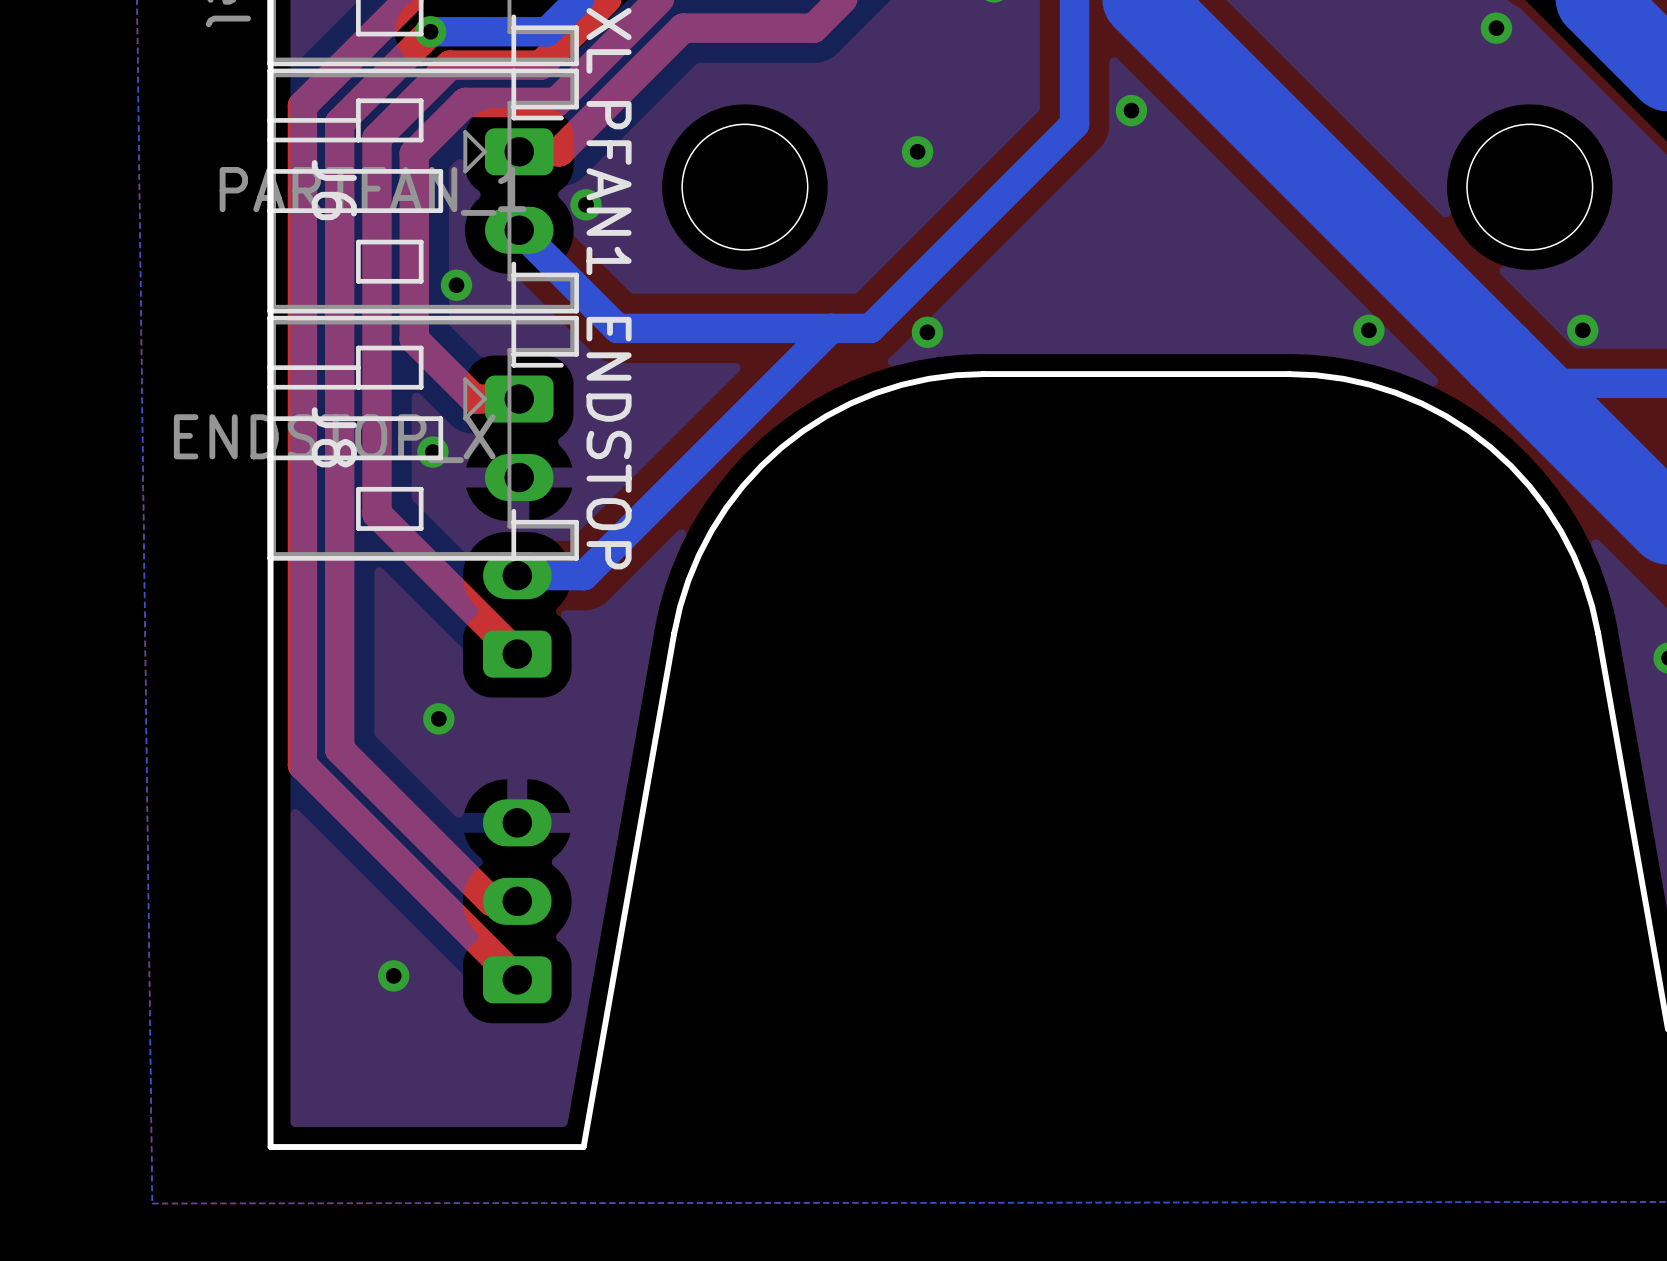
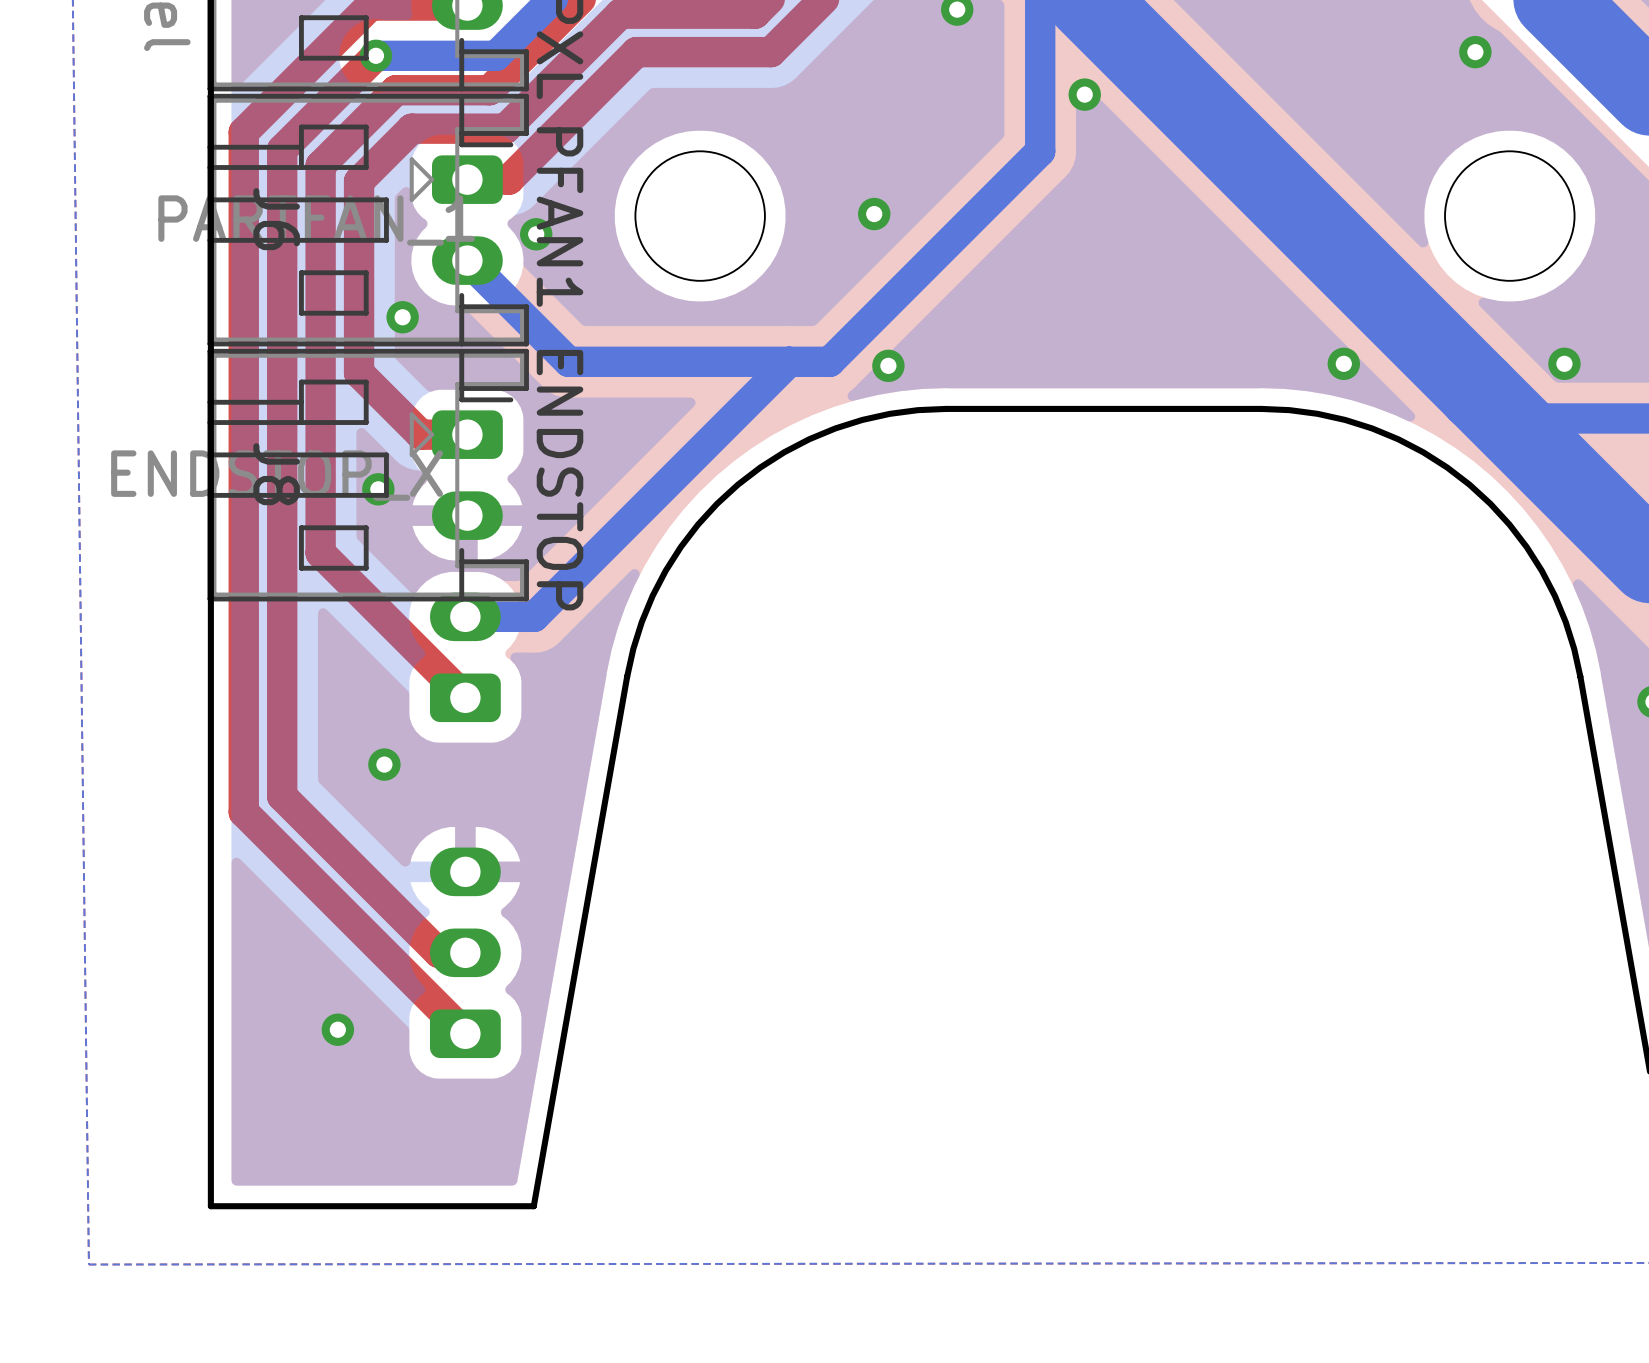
via position: (1131, 110) -> (1084, 94)
via position: (917, 151) -> (874, 214)

